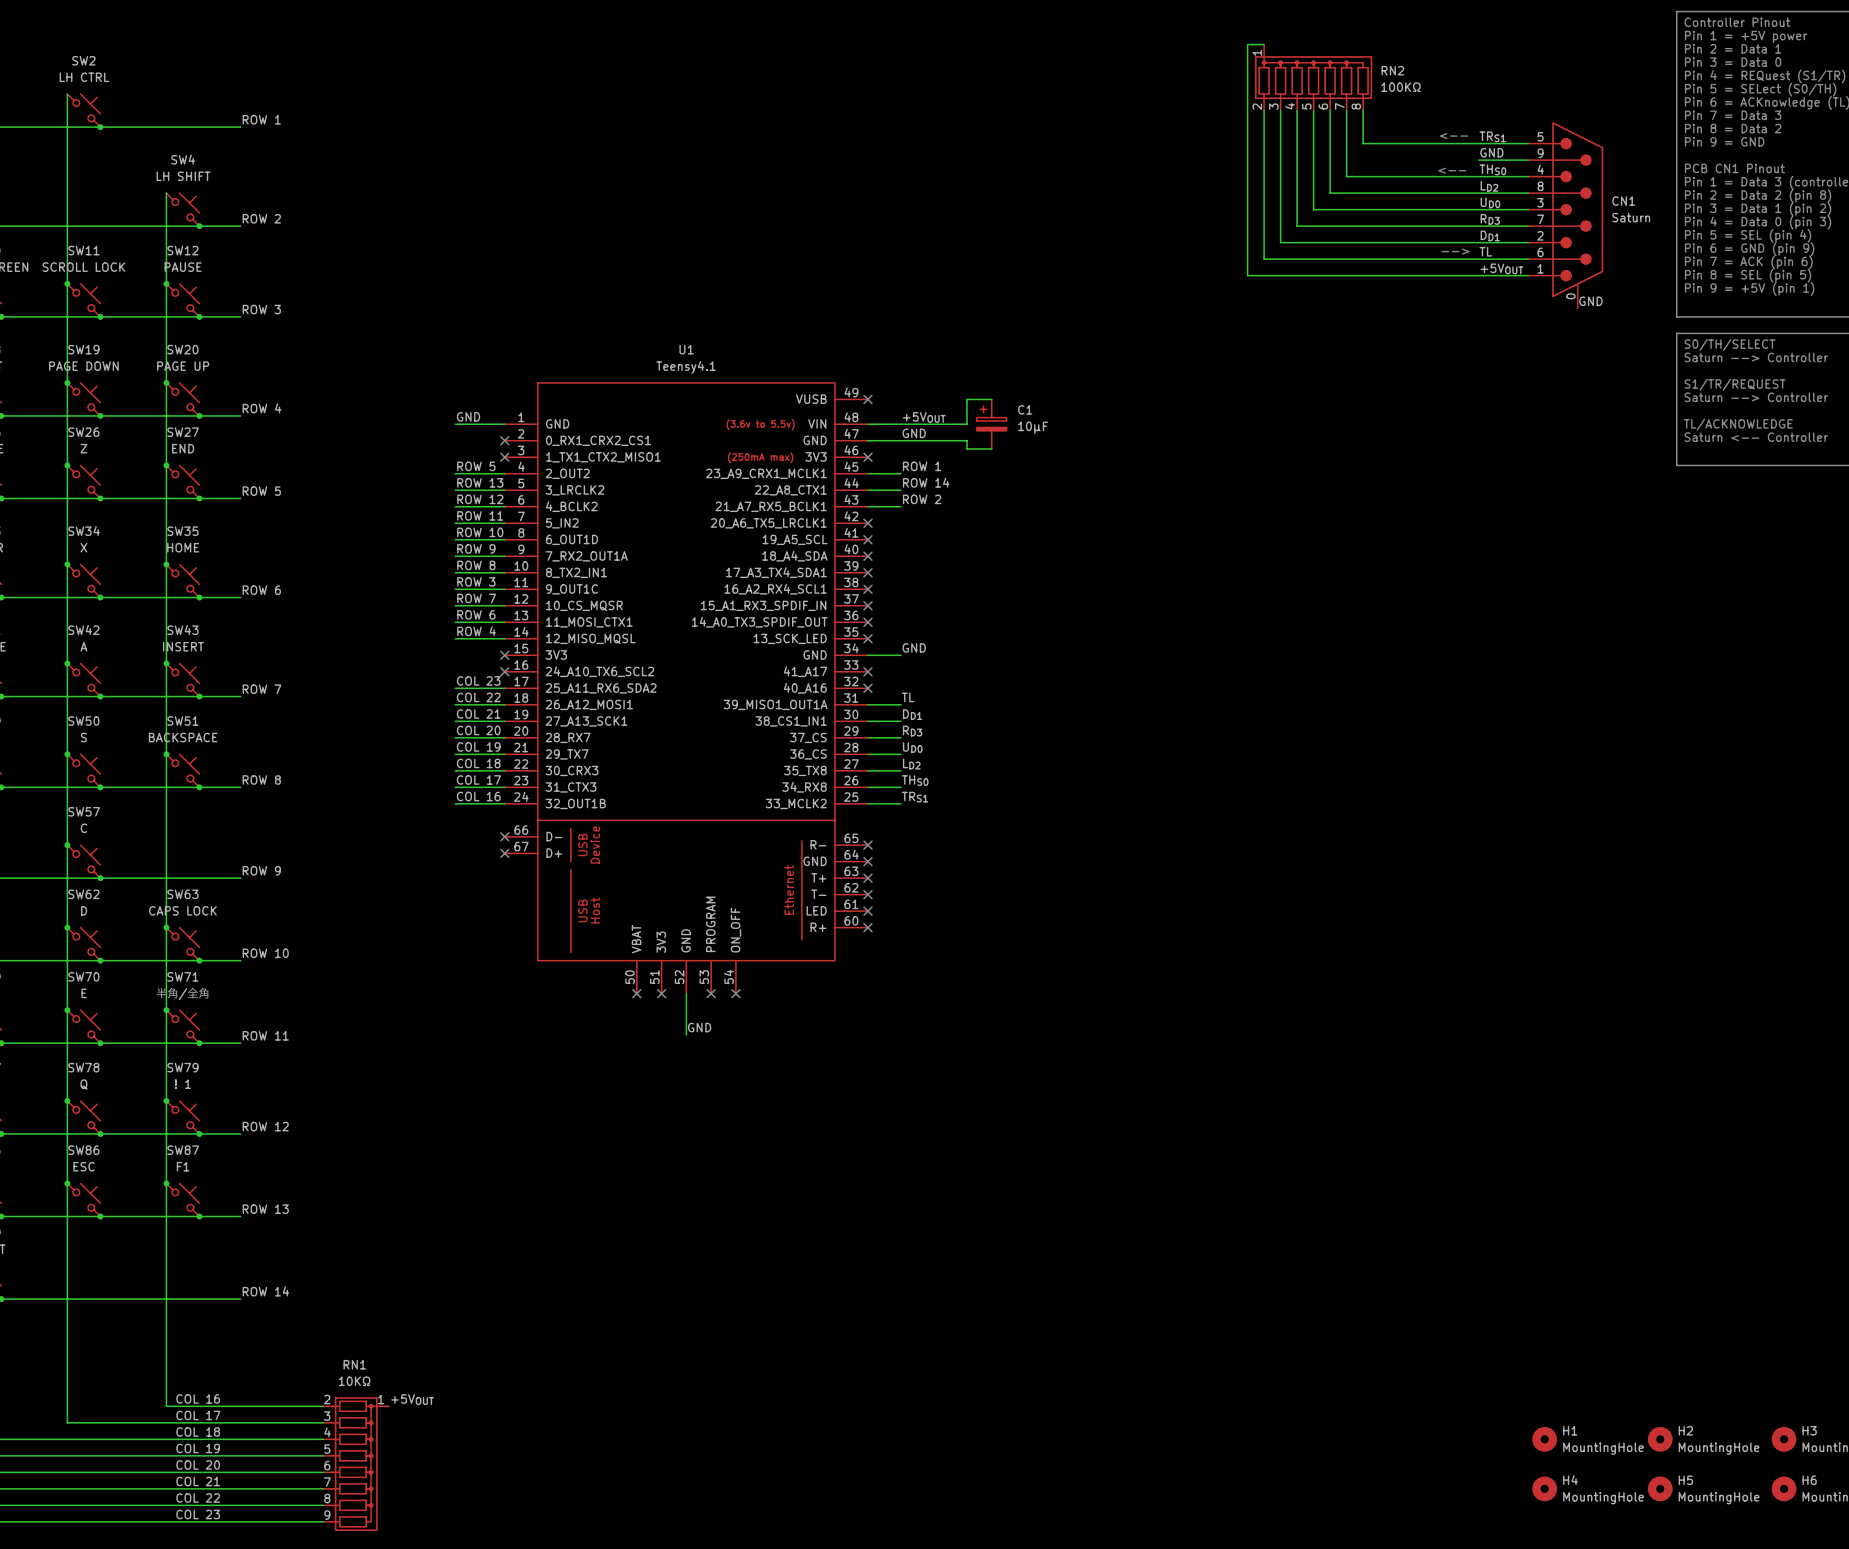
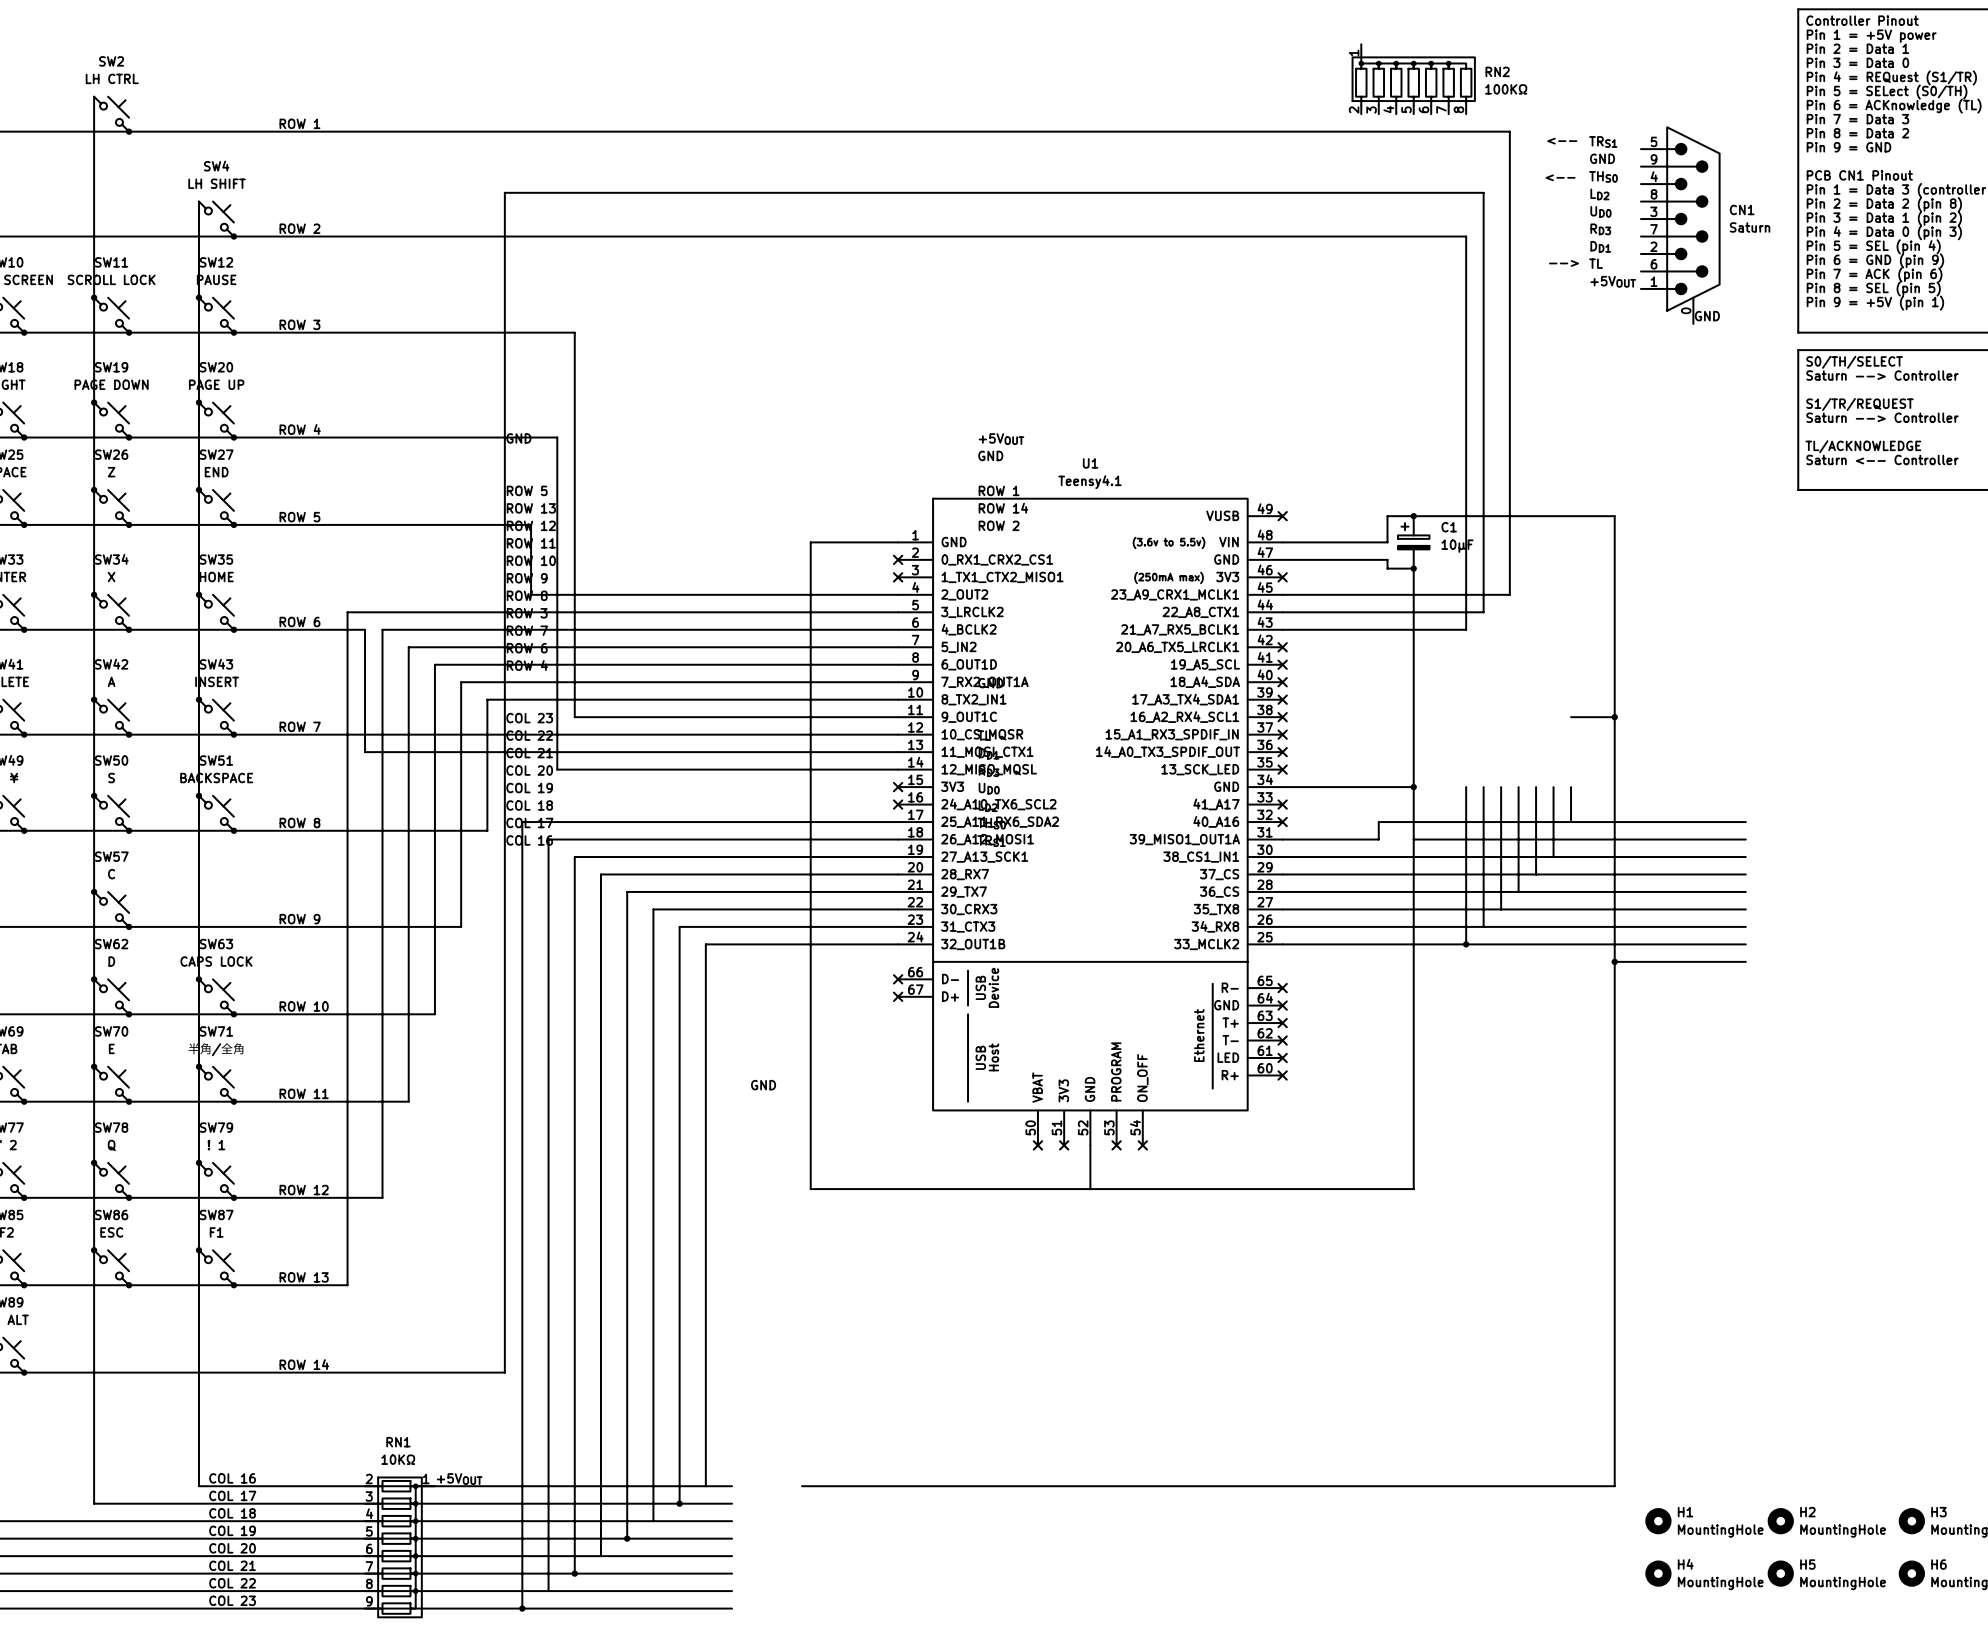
wire: (1264, 44) (1247, 44) (1247, 275) (1528, 275) -> none
wire: (1264, 110) (1264, 259) (1528, 259) -> none
wire: (1280, 110) (1280, 242) (1528, 242) -> none
wire: (1297, 110) (1297, 226) -> (277, 236) (1396, 236)
wire: (1313, 110) (1313, 209) (1528, 209) -> none
wire: (1330, 110) (1330, 193) (1528, 193) -> none
wire: (1346, 110) (1346, 176) (1528, 176) -> none
wire: (1363, 110) (1363, 143) (1528, 143) -> none
wire: none -> (277, 131) (1509, 131) (1509, 594) (1282, 594)
wire: (1478, 160) (1528, 160) -> none
wire: (1363, 226) (1528, 226) -> (1466, 236) (1466, 629) (1282, 629)
wire: none -> (277, 332) (574, 332) (574, 717) (898, 717)
no-connect mark: (867, 399) -> none
wire: (991, 399) (966, 399) (966, 424) (867, 424) -> none
wire: none -> (277, 437) (557, 437) (557, 769) (898, 769)
wire: (455, 424) (504, 424) -> none
C1 position: (991, 424) -> (1413, 542)
no-connect mark: (504, 440) -> none
wire: (867, 440) (966, 440) (966, 448) (991, 448) -> none
no-connect mark: (504, 457) -> none
no-connect mark: (867, 457) -> none
wire: (455, 473) (504, 473) -> none
wire: (455, 490) (504, 490) -> none
wire: (867, 490) (900, 490) -> none
no-connect mark: none -> (1282, 516)
junction: none -> (1413, 516)
wire: none -> (277, 524) (531, 524) (531, 594) (898, 594)
wire: (455, 506) (504, 506) -> none
wire: (867, 506) (900, 506) -> none
wire: none -> (898, 542) (810, 542) (810, 1189) (1413, 1189) (1413, 568) (1387, 568) (1387, 559) (1282, 559)
wire: none -> (1282, 542) (1387, 542) (1387, 516) (1614, 516) (1614, 1486) (801, 1486)
wire: (455, 523) (504, 523) -> none
no-connect mark: (867, 523) -> none
no-connect mark: none -> (898, 559)
wire: (455, 539) (504, 539) -> none
no-connect mark: (867, 539) -> none
junction: none -> (1413, 568)
no-connect mark: none -> (898, 577)
no-connect mark: none -> (1282, 577)
wire: (455, 556) (504, 556) -> none
no-connect mark: (867, 556) -> none
wire: (455, 572) (504, 572) -> none
no-connect mark: (867, 572) -> none
wire: none -> (898, 612) (347, 612) (347, 1285) (277, 1285)
wire: none -> (1282, 612) (1483, 612) (1483, 192) (504, 192) (504, 1372) (277, 1372)
wire: (455, 589) (504, 589) -> none
no-connect mark: (867, 589) -> none
wire: none -> (277, 629) (365, 629) (365, 752) (898, 752)
wire: none -> (898, 629) (382, 629) (382, 1197) (277, 1197)
wire: (455, 605) (504, 605) -> none
no-connect mark: (867, 605) -> none
wire: none -> (898, 647) (408, 647) (408, 1101) (277, 1101)
no-connect mark: none -> (1282, 647)
wire: (455, 622) (504, 622) -> none
no-connect mark: (867, 622) -> none
wire: none -> (898, 664) (434, 664) (434, 1014) (277, 1014)
no-connect mark: none -> (1282, 664)
wire: (455, 638) (504, 638) -> none
no-connect mark: (867, 638) -> none
wire: none -> (898, 682) (461, 682) (461, 926) (277, 926)
no-connect mark: none -> (1282, 682)
no-connect mark: (504, 655) -> none
wire: (867, 655) (900, 655) -> none
wire: none -> (898, 699) (487, 699) (487, 830) (277, 830)
no-connect mark: none -> (1282, 699)
no-connect mark: (504, 671) -> none
no-connect mark: (867, 671) -> none
no-connect mark: none -> (1282, 717)
wire: none -> (1571, 717) (1614, 717)
junction: none -> (1614, 717)
wire: (455, 688) (504, 688) -> none
U1 position: (686, 688) -> (1090, 822)
no-connect mark: (867, 688) -> none
wire: none -> (277, 734) (898, 734)
no-connect mark: none -> (1282, 734)
wire: (455, 704) (504, 704) -> none
wire: (867, 704) (900, 704) -> none
no-connect mark: none -> (1282, 752)
wire: (455, 721) (504, 721) -> none
wire: (867, 721) (900, 721) -> none
no-connect mark: none -> (1282, 769)
wire: (455, 737) (504, 737) -> none
wire: (867, 737) (900, 737) -> none
no-connect mark: none -> (898, 787)
wire: none -> (1282, 787) (1413, 787)
junction: none -> (1413, 787)
wire: none -> (1466, 787) (1466, 944)
wire: none -> (1483, 787) (1483, 926)
wire: none -> (1501, 787) (1501, 909)
wire: none -> (1518, 787) (1518, 891)
wire: none -> (1536, 787) (1536, 874)
wire: none -> (1553, 787) (1553, 857)
wire: none -> (1571, 787) (1571, 822)
wire: (455, 754) (504, 754) -> none
wire: (867, 754) (900, 754) -> none
no-connect mark: none -> (898, 804)
no-connect mark: none -> (1282, 804)
wire: (455, 770) (504, 770) -> none
wire: (867, 770) (900, 770) -> none
wire: none -> (898, 822) (522, 822) (522, 1608)
no-connect mark: none -> (1282, 822)
wire: none -> (1745, 822) (1378, 822) (1378, 839) (1282, 839)
wire: (455, 787) (504, 787) -> none
wire: (867, 787) (900, 787) -> none
wire: none -> (898, 839) (548, 839) (548, 1591)
wire: none -> (1413, 839) (1745, 839)
wire: (455, 803) (504, 803) -> none
wire: (867, 803) (900, 803) -> none
wire: none -> (898, 857) (574, 857) (574, 1573)
wire: none -> (1282, 857) (1745, 857)
wire: none -> (898, 874) (600, 874) (600, 1556)
wire: none -> (1282, 874) (1745, 874)
no-connect mark: (504, 836) -> none
wire: none -> (898, 891) (627, 891) (627, 1538)
no-connect mark: (867, 845) -> none
wire: none -> (1282, 891) (1745, 891)
no-connect mark: (504, 853) -> none
wire: none -> (898, 909) (653, 909) (653, 1521)
no-connect mark: (867, 861) -> none
wire: none -> (1282, 909) (1745, 909)
wire: none -> (898, 926) (679, 926) (679, 1503)
no-connect mark: (867, 878) -> none
wire: none -> (1282, 926) (1745, 926)
wire: none -> (898, 944) (705, 944) (705, 1486)
no-connect mark: (867, 894) -> none
wire: none -> (1282, 944) (1745, 944)
junction: none -> (1466, 944)
no-connect mark: (867, 911) -> none
wire: none -> (1614, 961) (1745, 961)
junction: none -> (1614, 961)
no-connect mark: none -> (898, 979)
no-connect mark: (867, 927) -> none
no-connect mark: none -> (1282, 988)
no-connect mark: none -> (898, 996)
no-connect mark: none -> (1282, 1005)
no-connect mark: none -> (1282, 1023)
no-connect mark: none -> (1282, 1040)
no-connect mark: (636, 993) -> none
no-connect mark: (661, 993) -> none
wire: (686, 993) (686, 1034) -> none
no-connect mark: (711, 993) -> none
no-connect mark: (735, 993) -> none
no-connect mark: none -> (1282, 1058)
no-connect mark: none -> (1282, 1075)
no-connect mark: none -> (1037, 1145)
no-connect mark: none -> (1064, 1145)
wire: none -> (1090, 1145) (1090, 1189)
no-connect mark: none -> (1116, 1145)
no-connect mark: none -> (1142, 1145)
wire: none -> (365, 1486) (732, 1486)
wire: none -> (365, 1503) (732, 1503)
junction: none -> (679, 1503)
wire: none -> (365, 1521) (732, 1521)
wire: none -> (365, 1538) (732, 1538)
junction: none -> (627, 1538)
wire: none -> (365, 1556) (732, 1556)
wire: none -> (365, 1573) (732, 1573)
junction: none -> (574, 1573)
wire: none -> (365, 1591) (732, 1591)
wire: none -> (365, 1608) (732, 1608)
junction: none -> (522, 1608)

